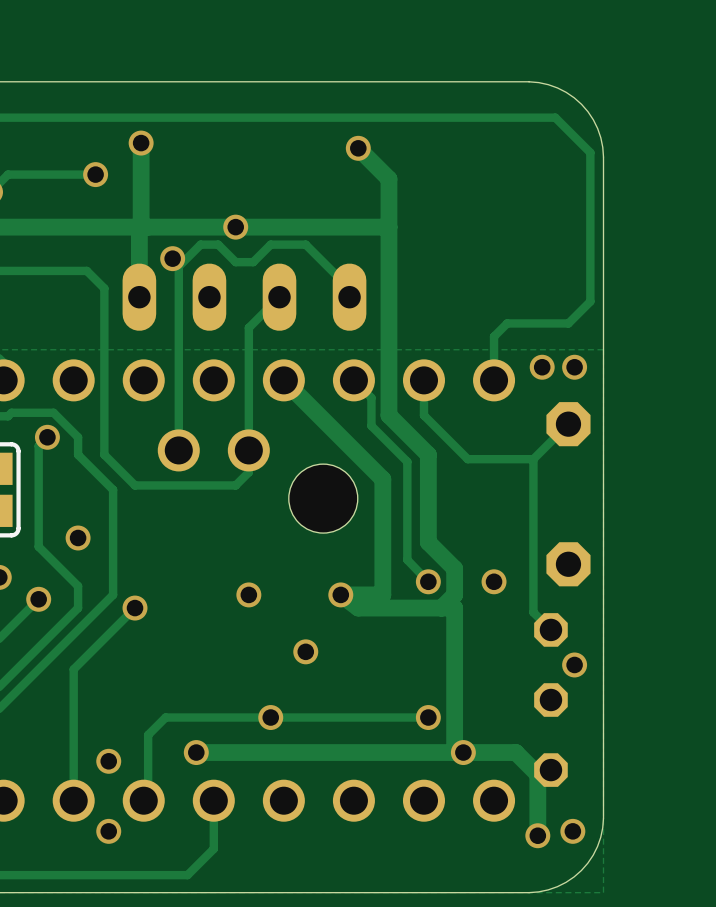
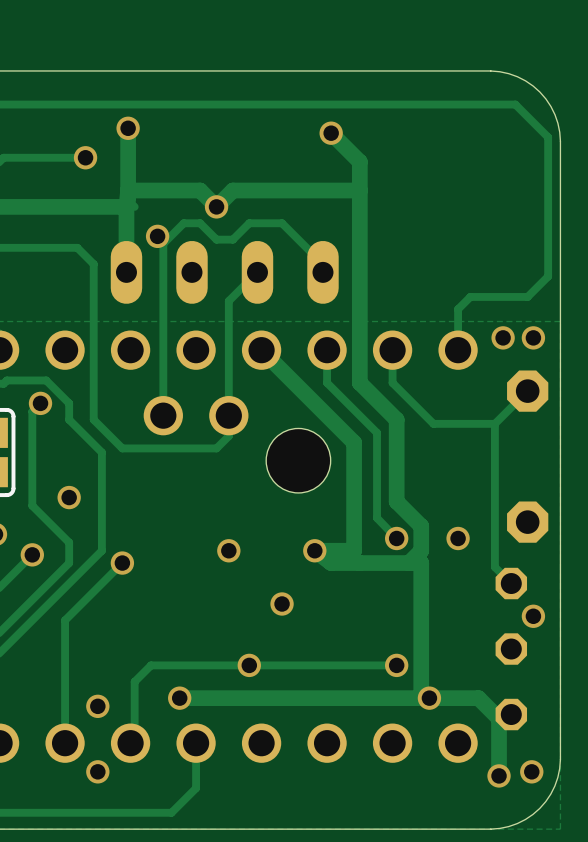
track: (388, 227) (139, 227) -> (359, 190) (232, 190) (216, 206) (200, 190) (128, 190) (126, 206)
track: (353, 380) (371, 397) (371, 425) (407, 461) (407, 468) -> (327, 350) (327, 382) (377, 432)

